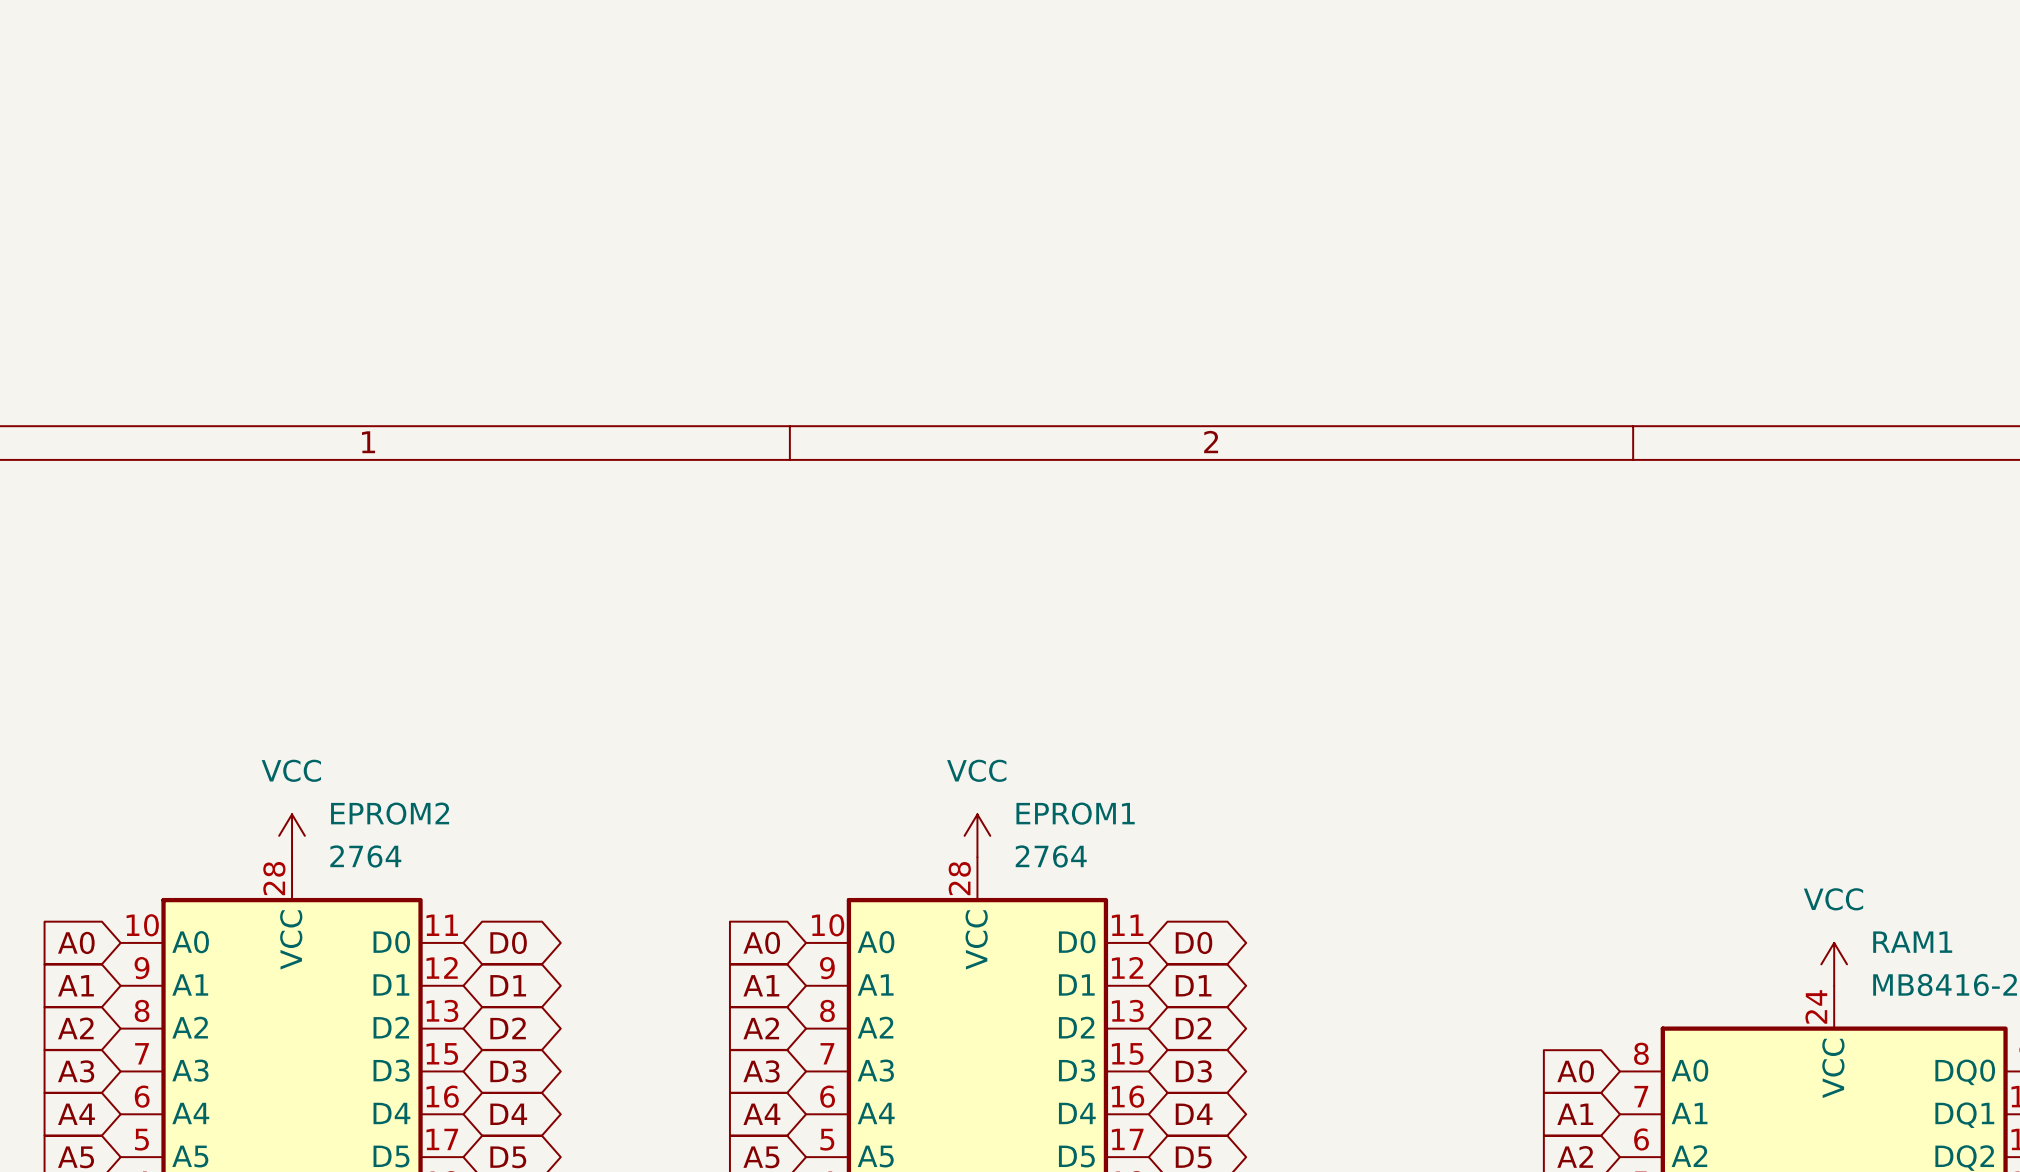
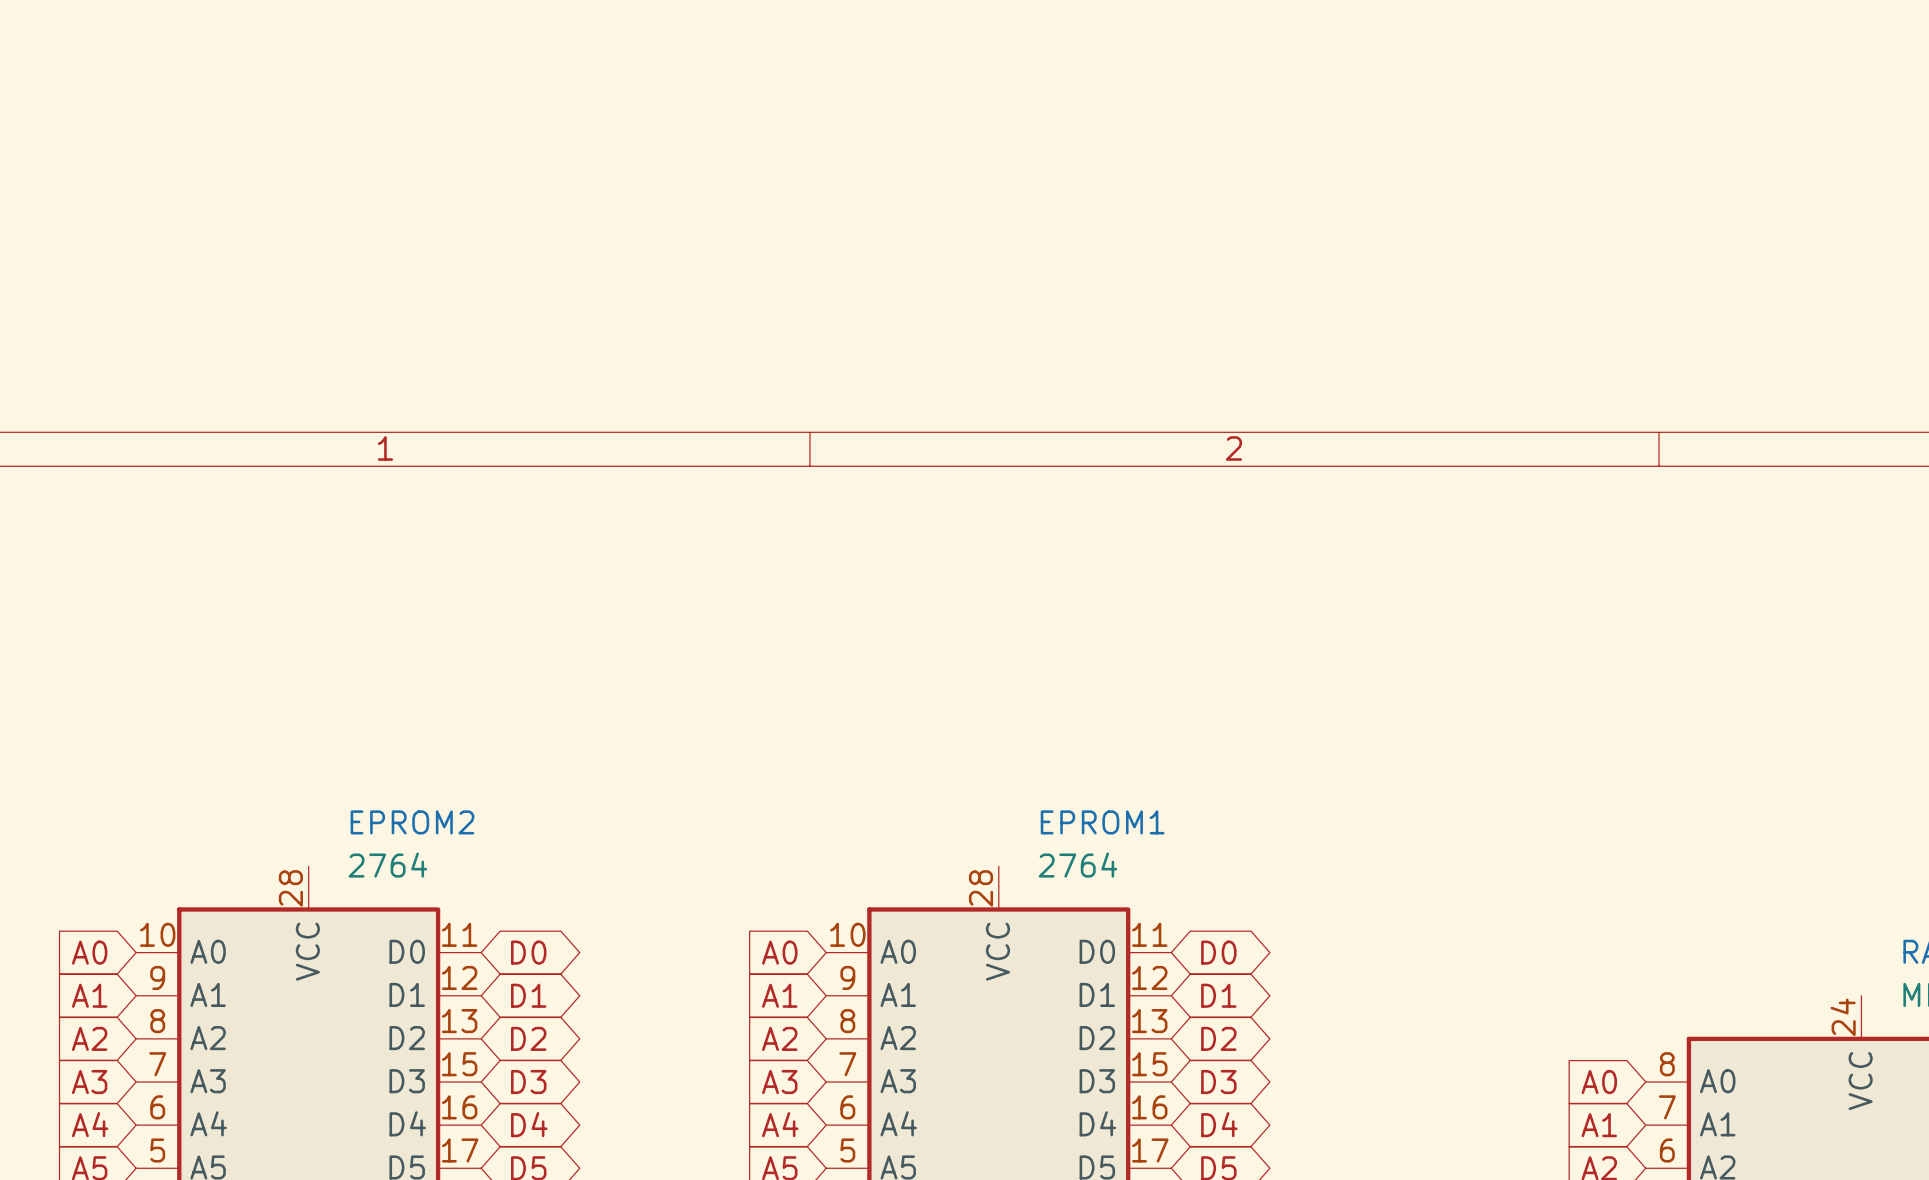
power symbol: VCC (292, 835) -> none
power symbol: VCC (977, 835) -> none
power symbol: VCC (1834, 964) -> none

